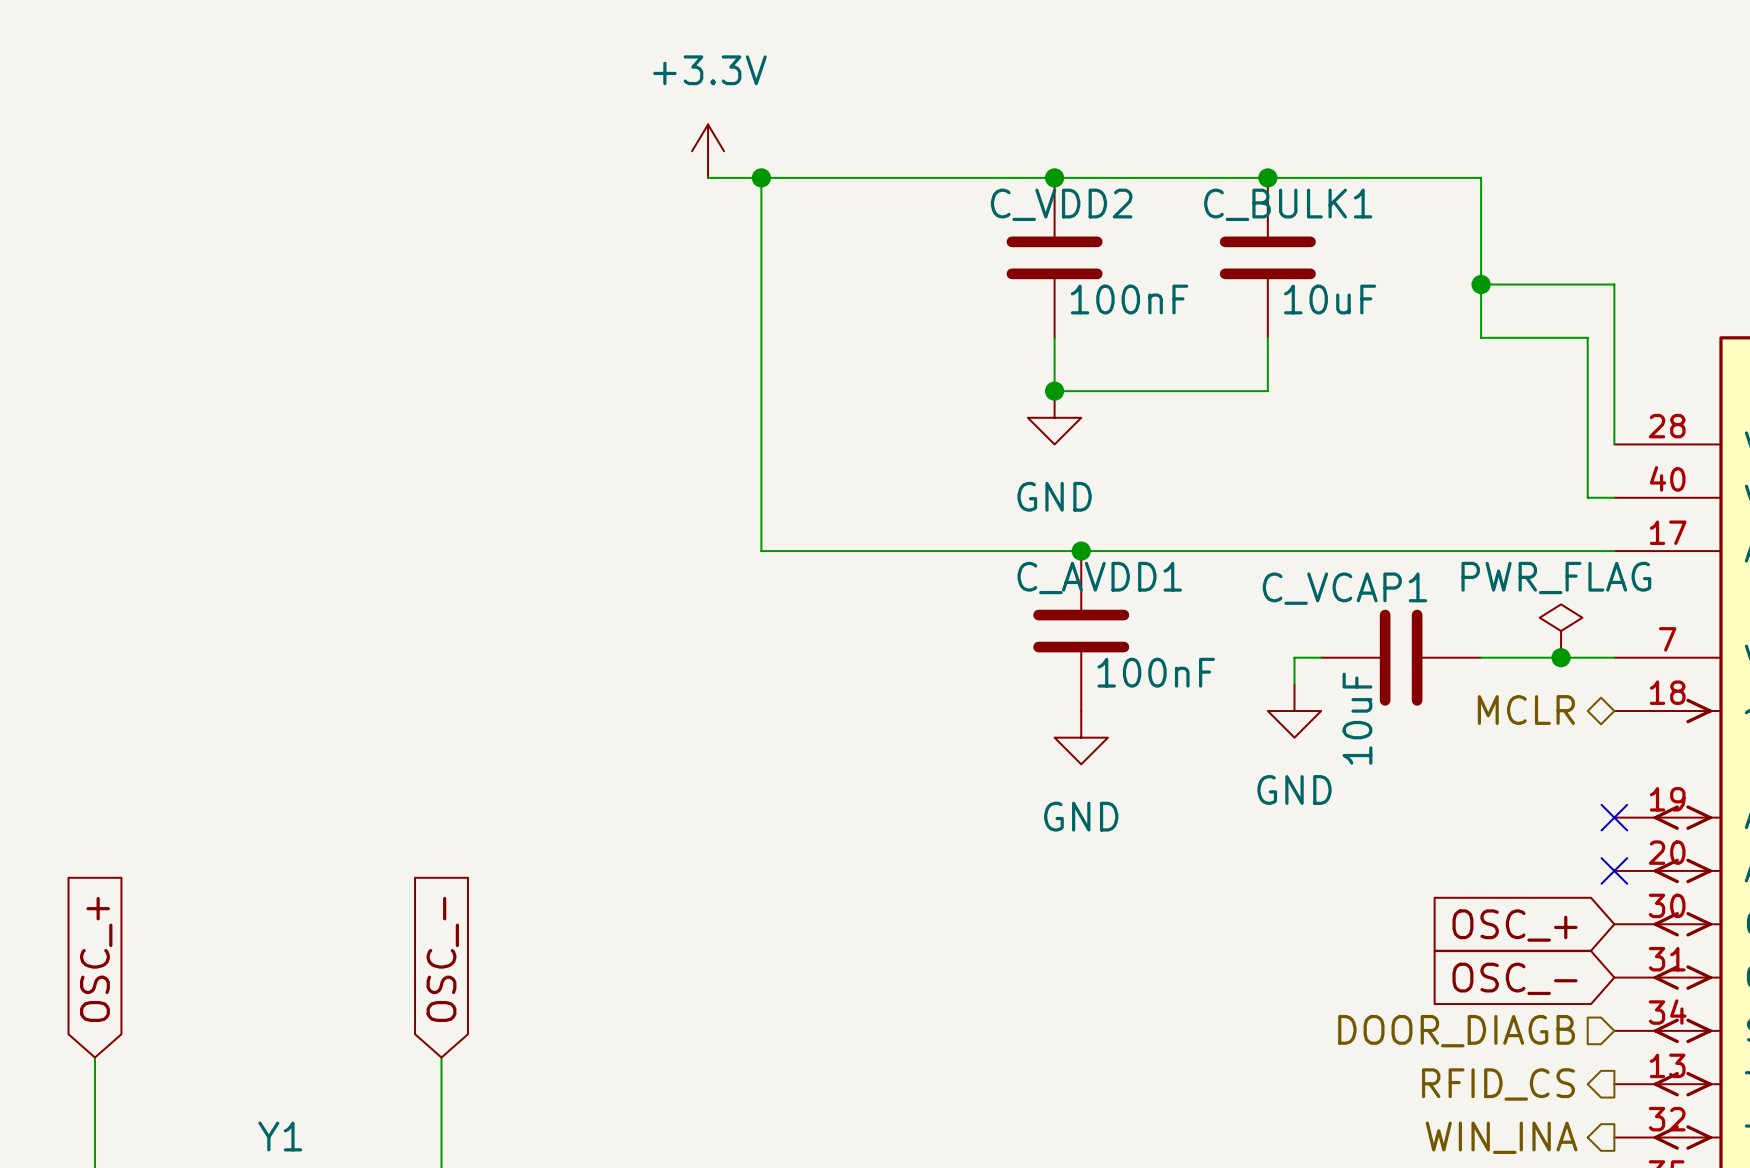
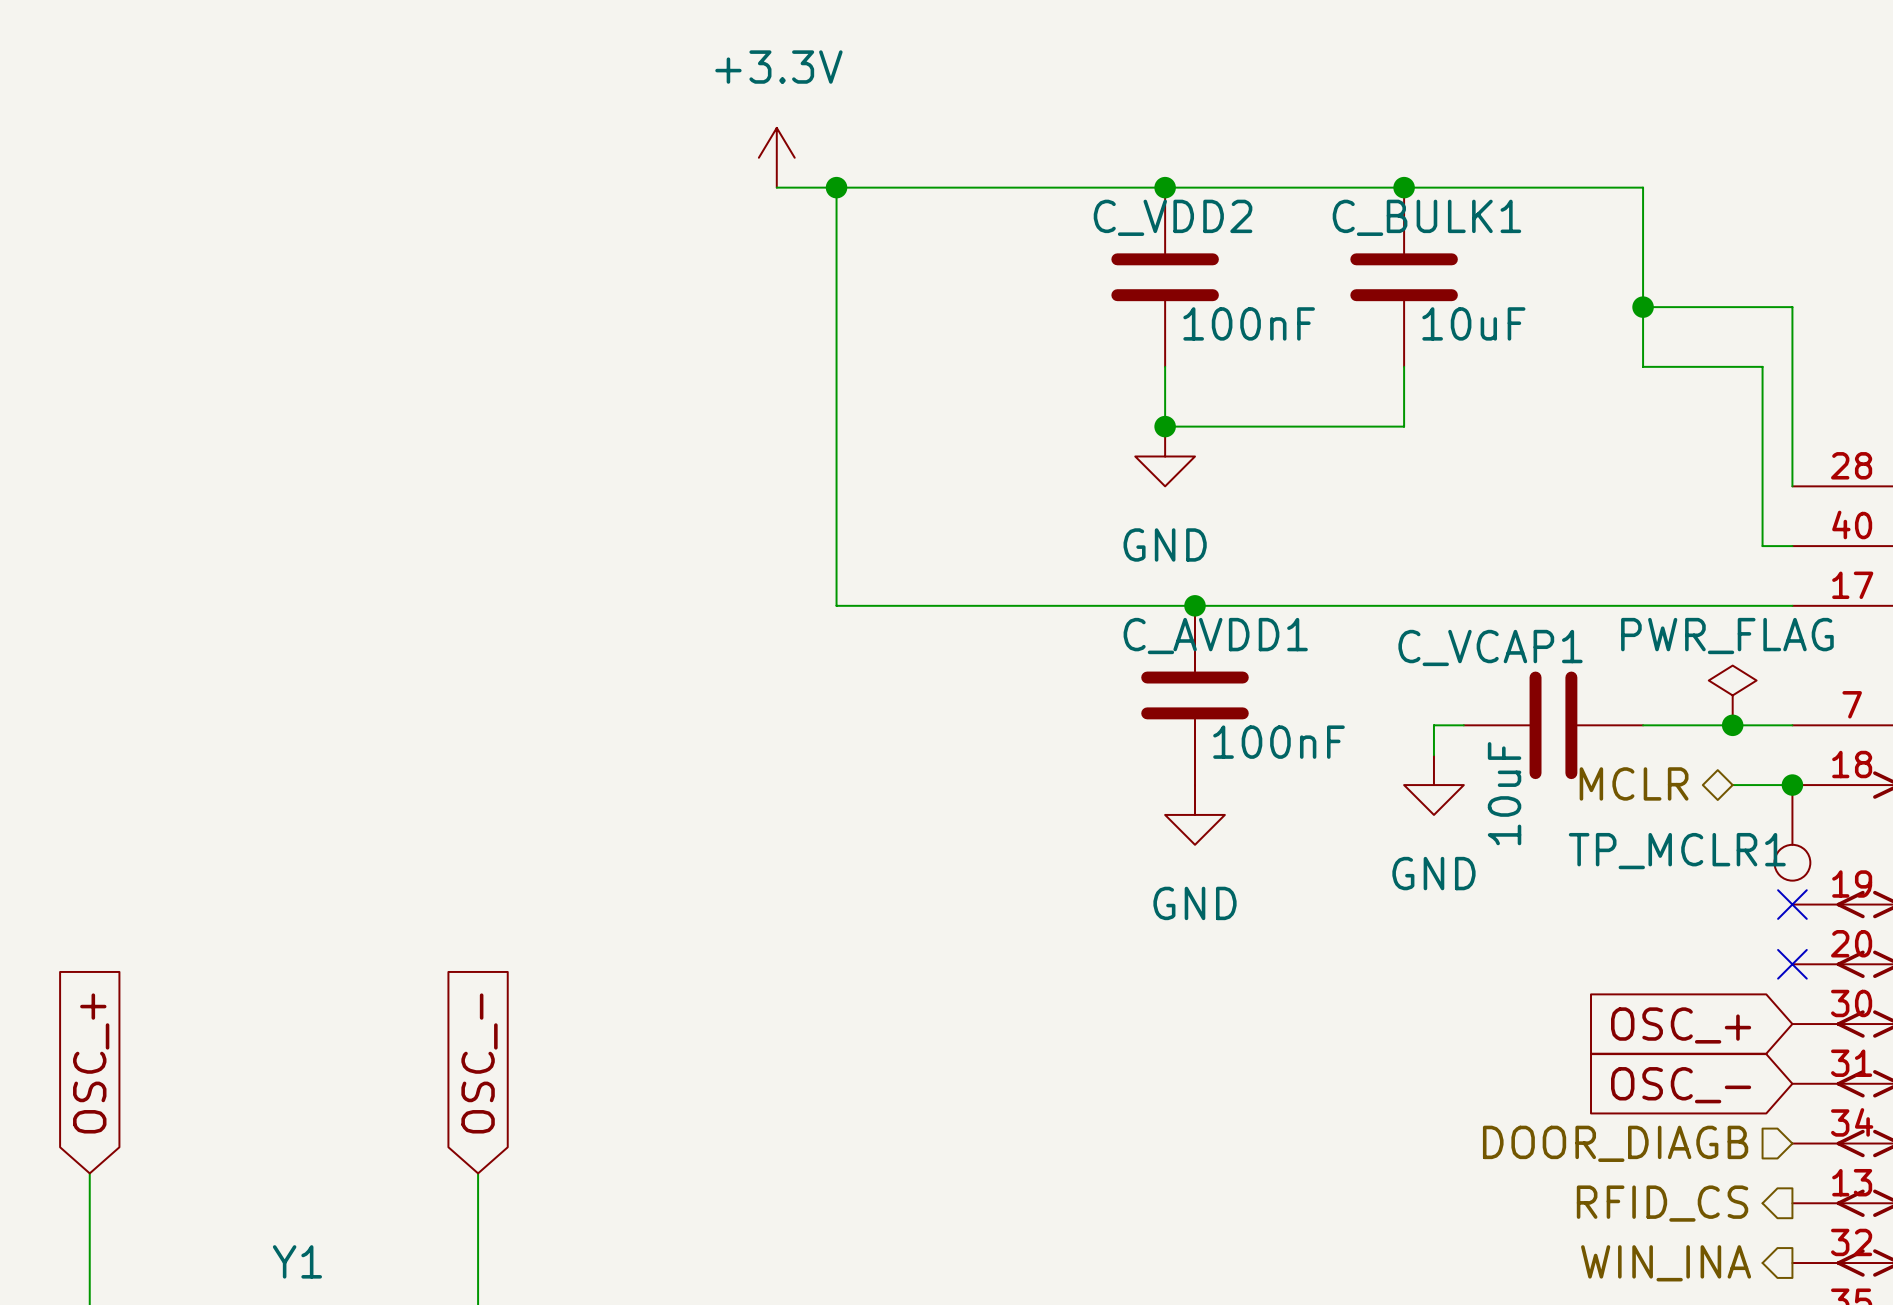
hierarchical label position: MCLR (1526, 710) -> MCLR (1634, 783)
wire: none -> (1732, 785) (1792, 785)
junction: none -> (1792, 785)
TP_MCLR1: none -> (1792, 832)

